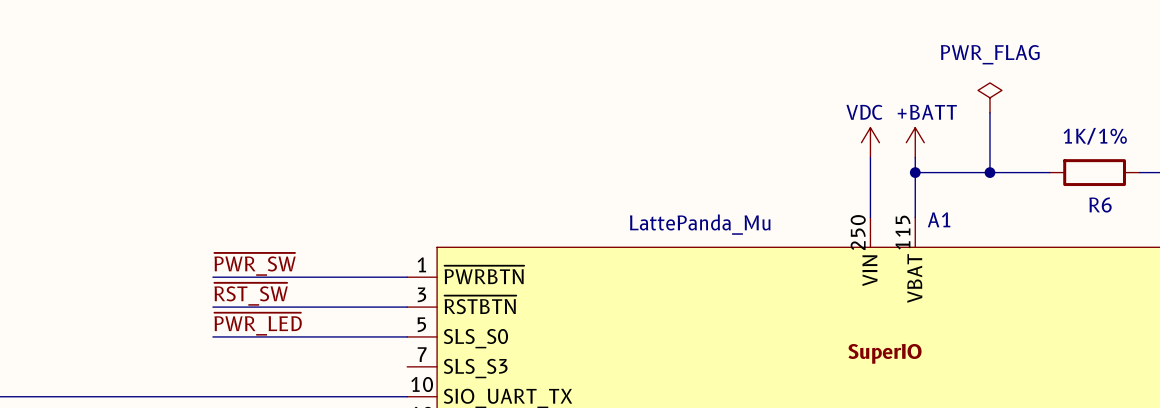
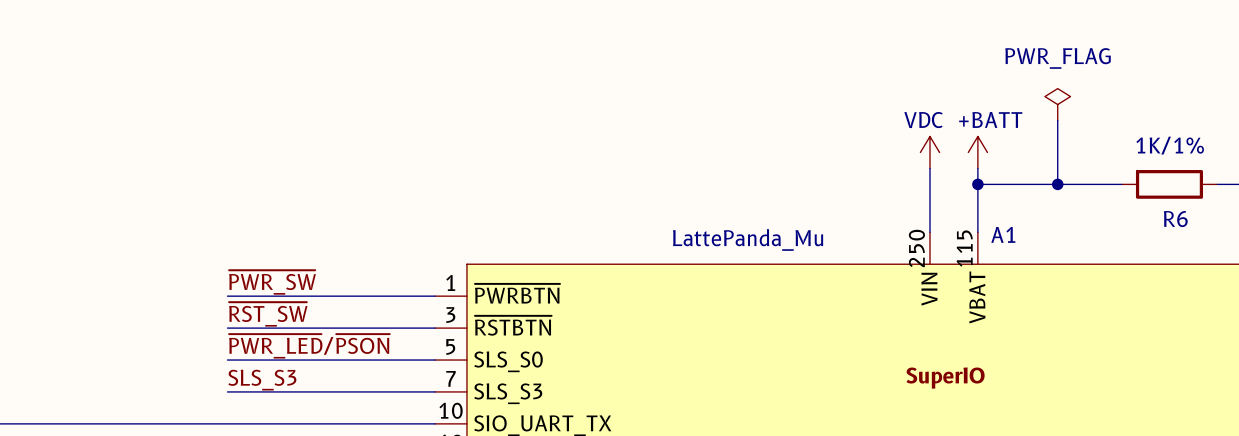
label: ~{PWR_LED} (258, 324) -> ~{PWR_LED}/~{PSON} (309, 346)
label: none -> SLS_S3 (262, 380)
wire: none -> (227, 391) (435, 391)

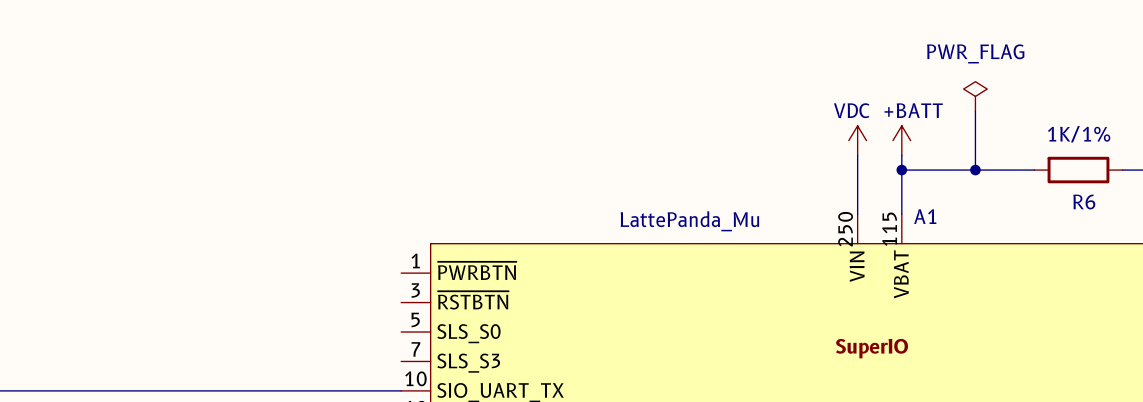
label: ~{PWR_SW} (272, 282) -> none
wire: (227, 296) (435, 296) -> none
label: ~{RST_SW} (268, 314) -> none
wire: (227, 328) (435, 328) -> none
label: ~{PWR_LED}/~{PSON} (309, 346) -> none
wire: (227, 360) (435, 360) -> none
label: SLS_S3 (262, 380) -> none
wire: (227, 391) (435, 391) -> none

